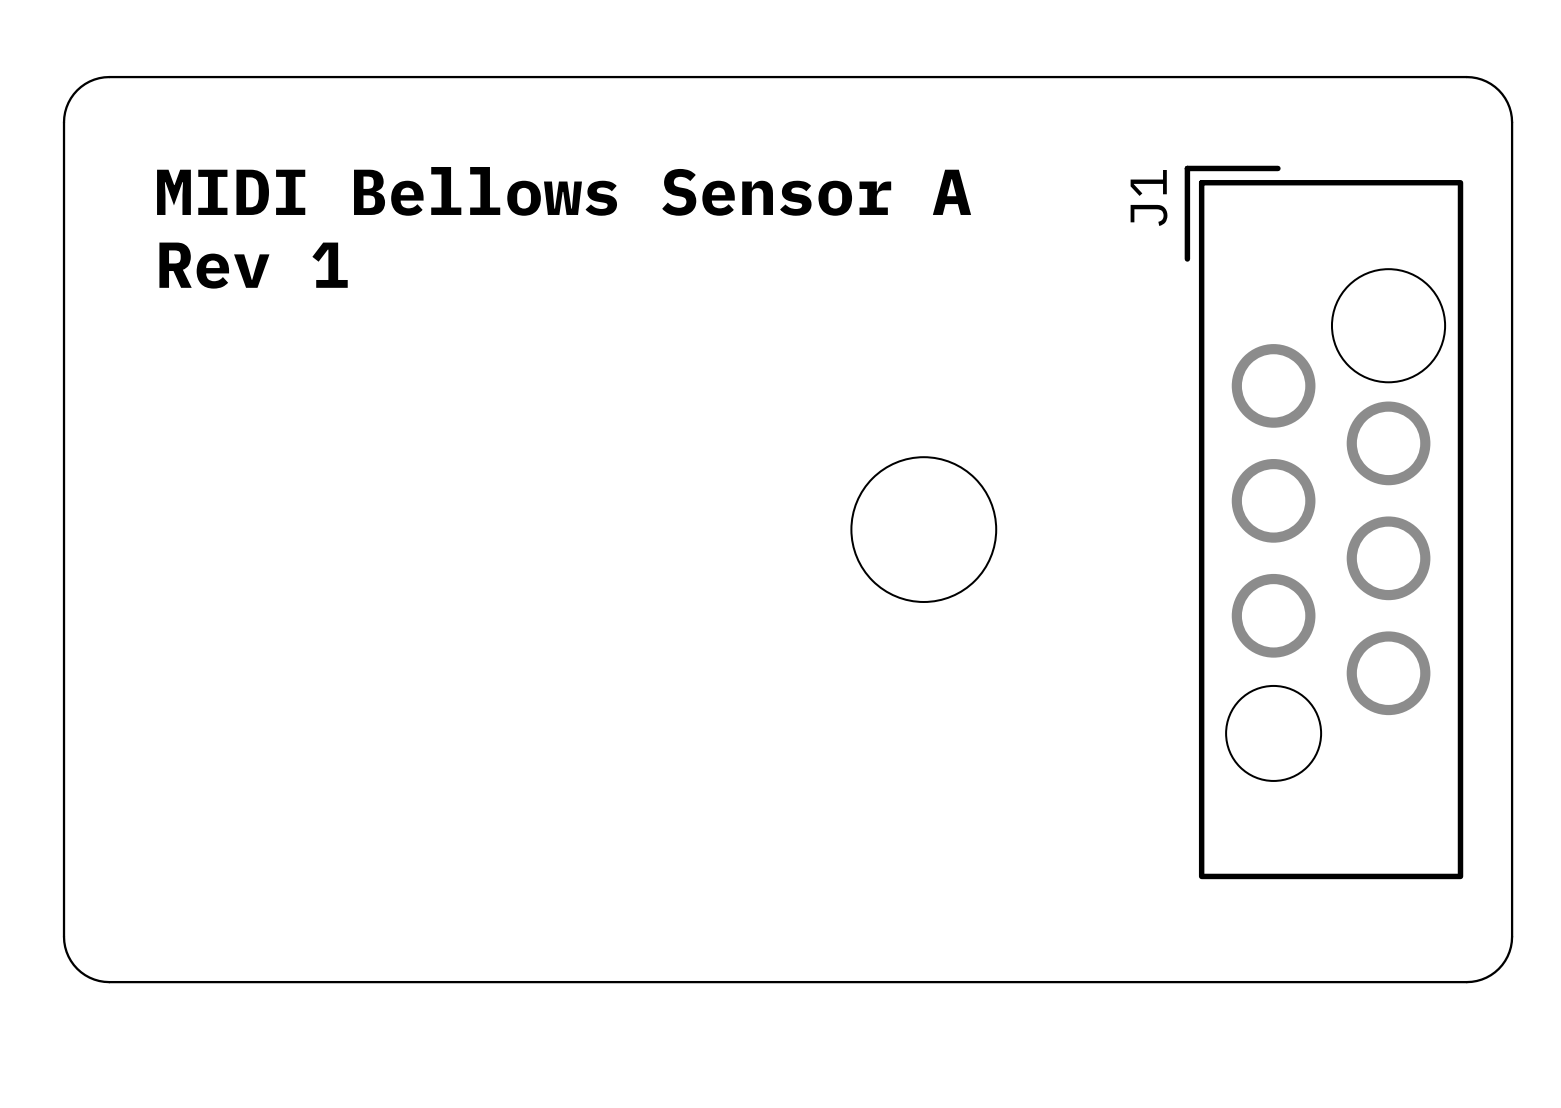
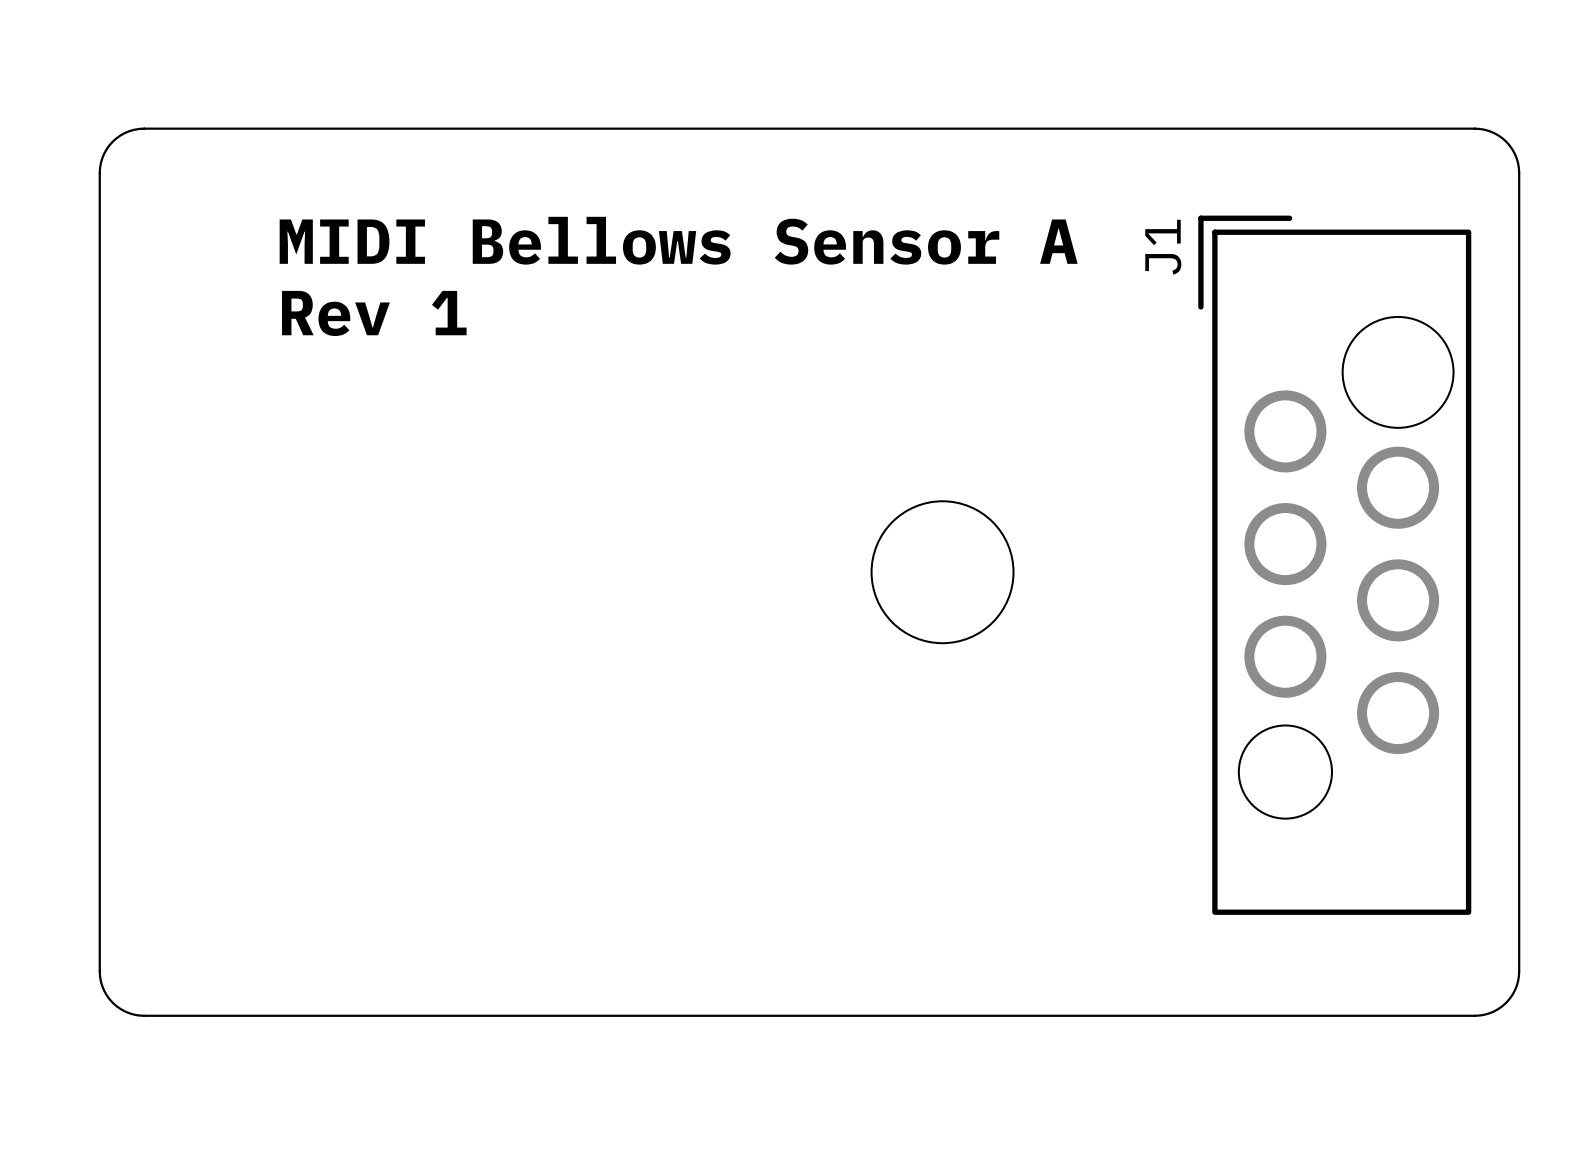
text position: MIDI Bellows Sensor A (564, 191) -> MIDI Bellows Sensor A (678, 240)
text position: Rev 1 (253, 265) -> Rev 1 (374, 313)

